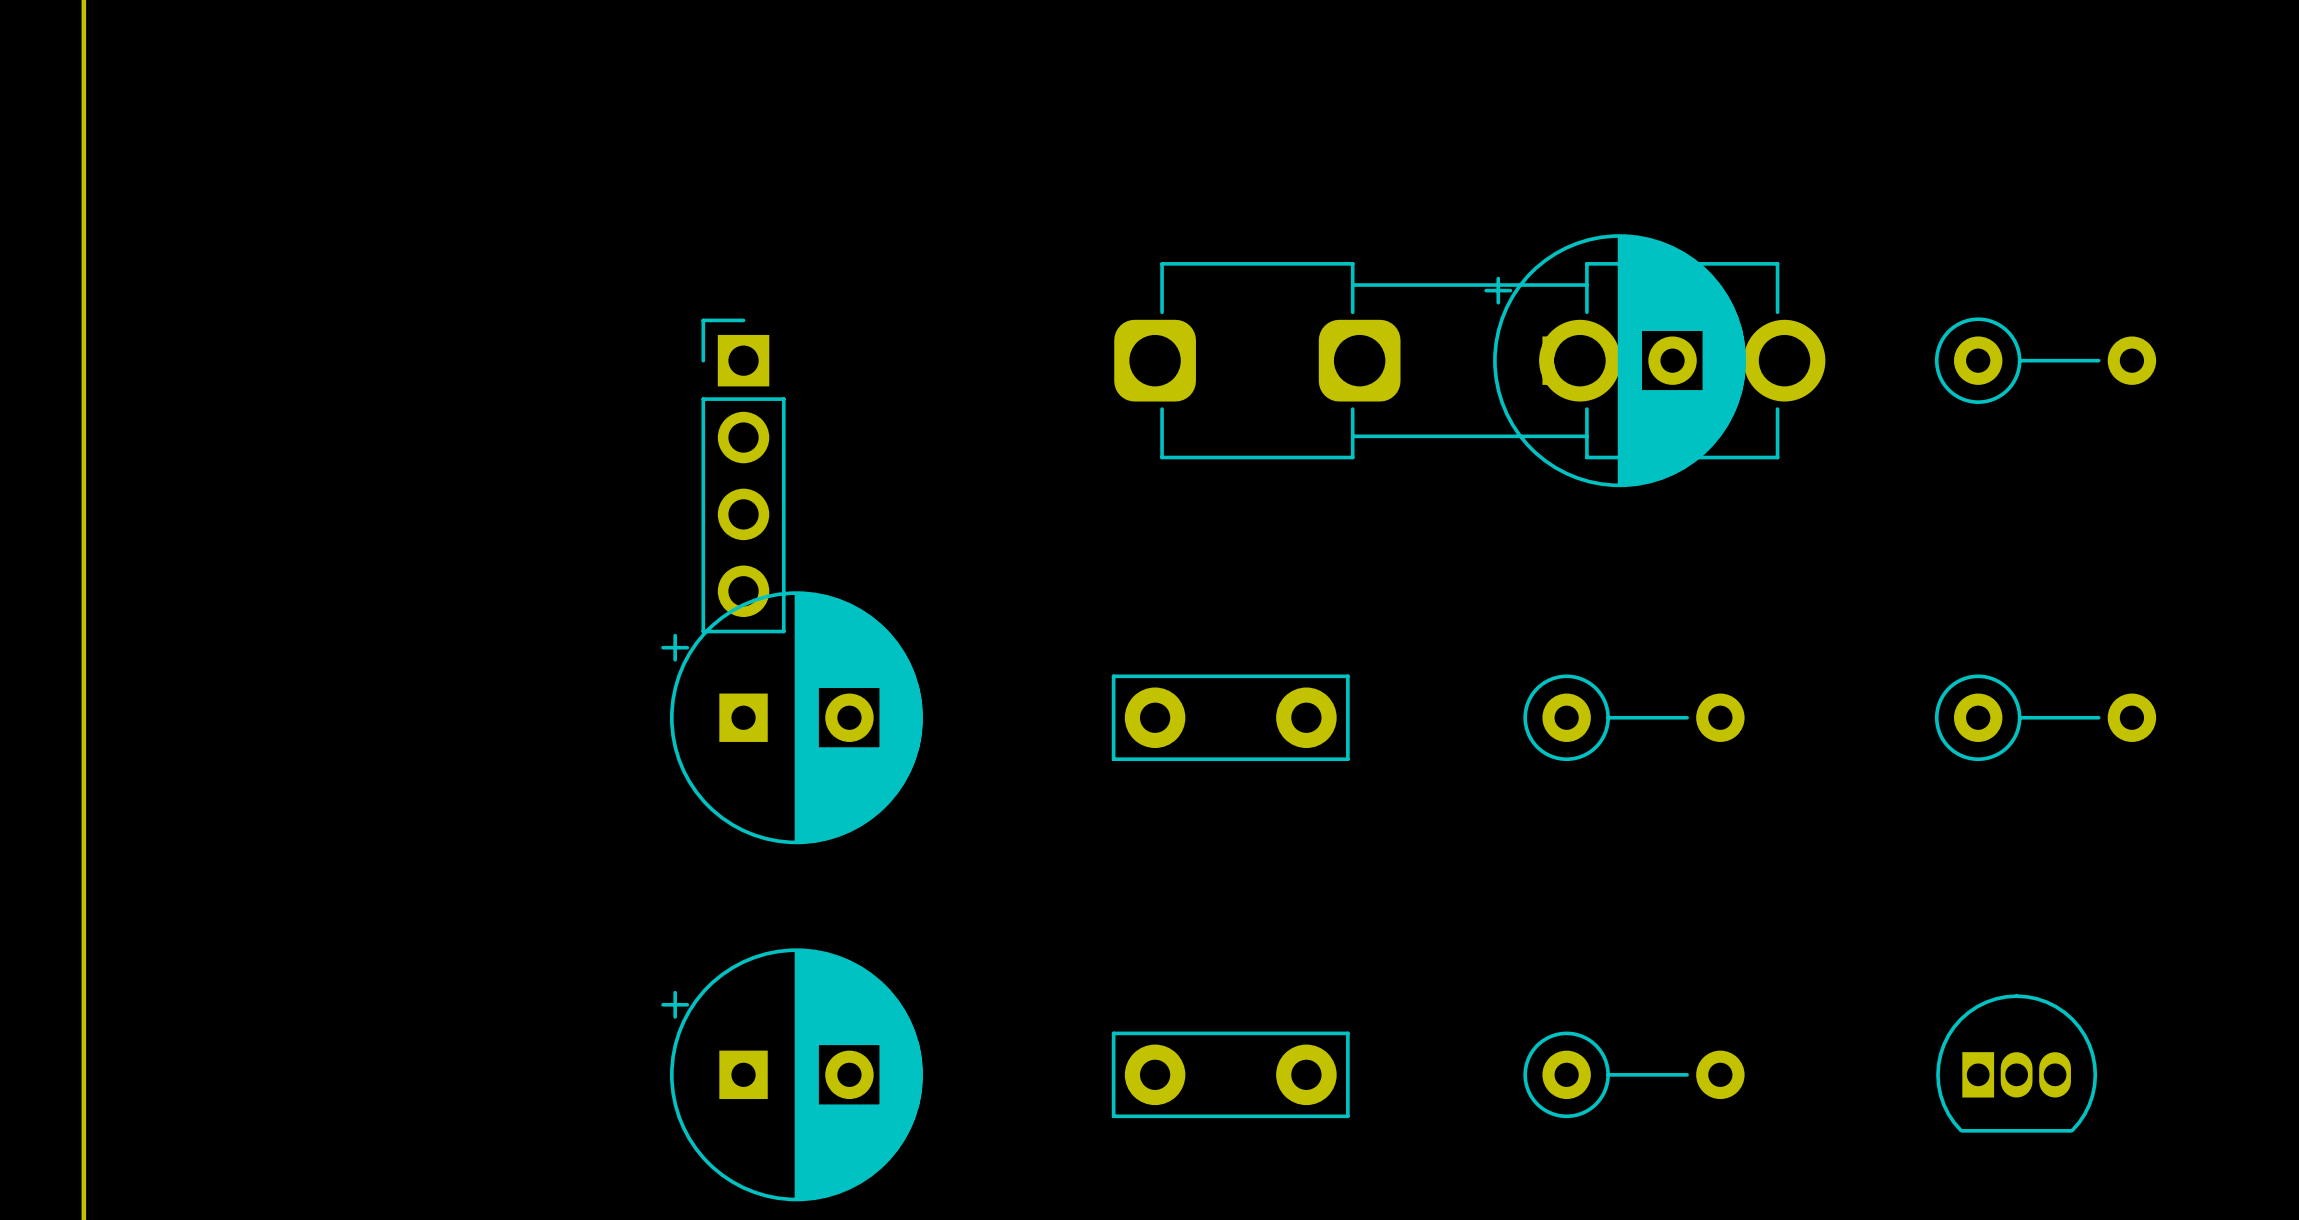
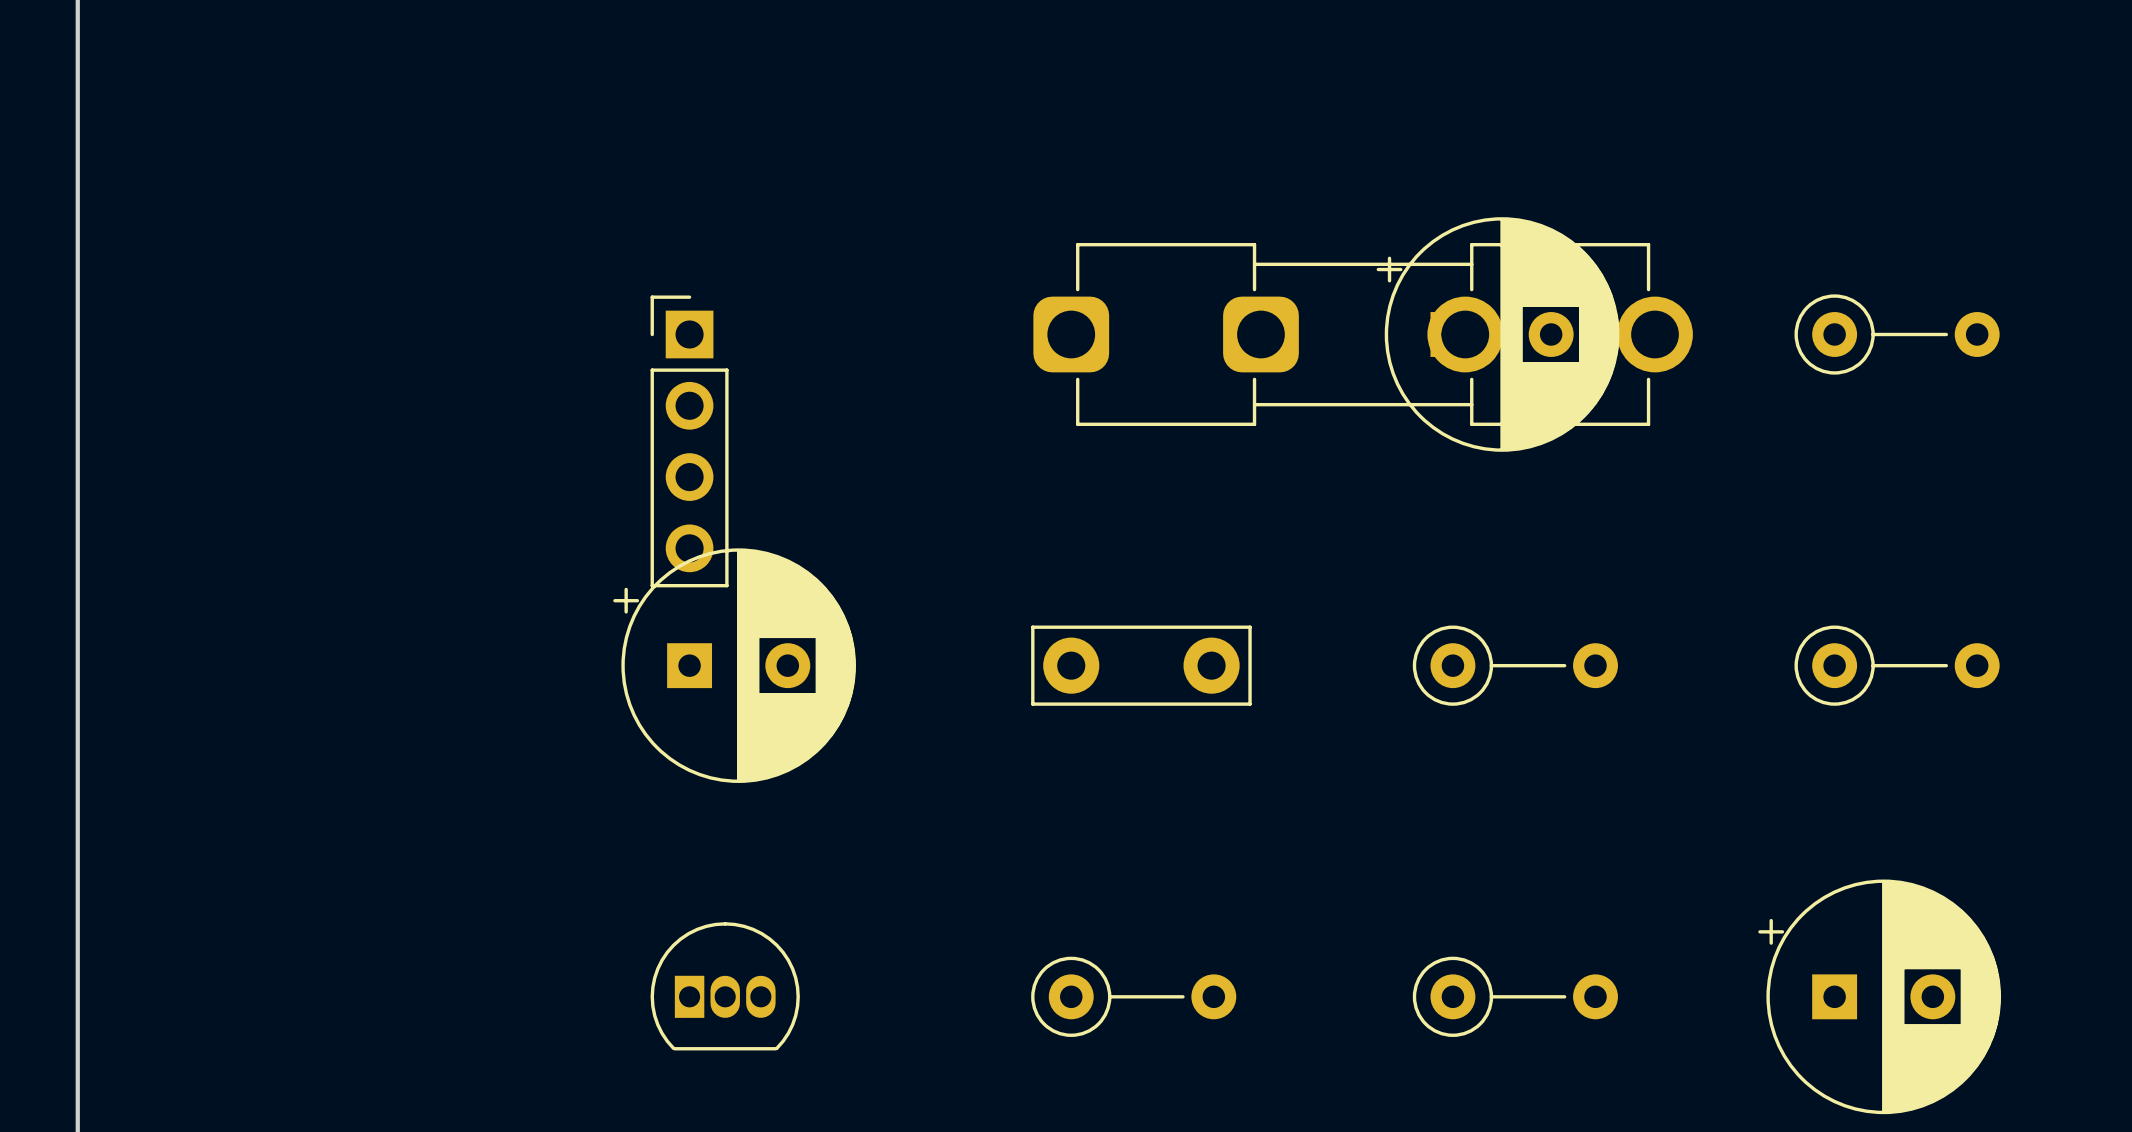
part footprint: [661, 948, 923, 1202] -> [650, 922, 800, 1051]
part footprint: [1936, 994, 2098, 1133] -> [1758, 879, 2002, 1115]
part footprint: [1111, 1031, 1350, 1119] -> [1031, 956, 1237, 1037]

